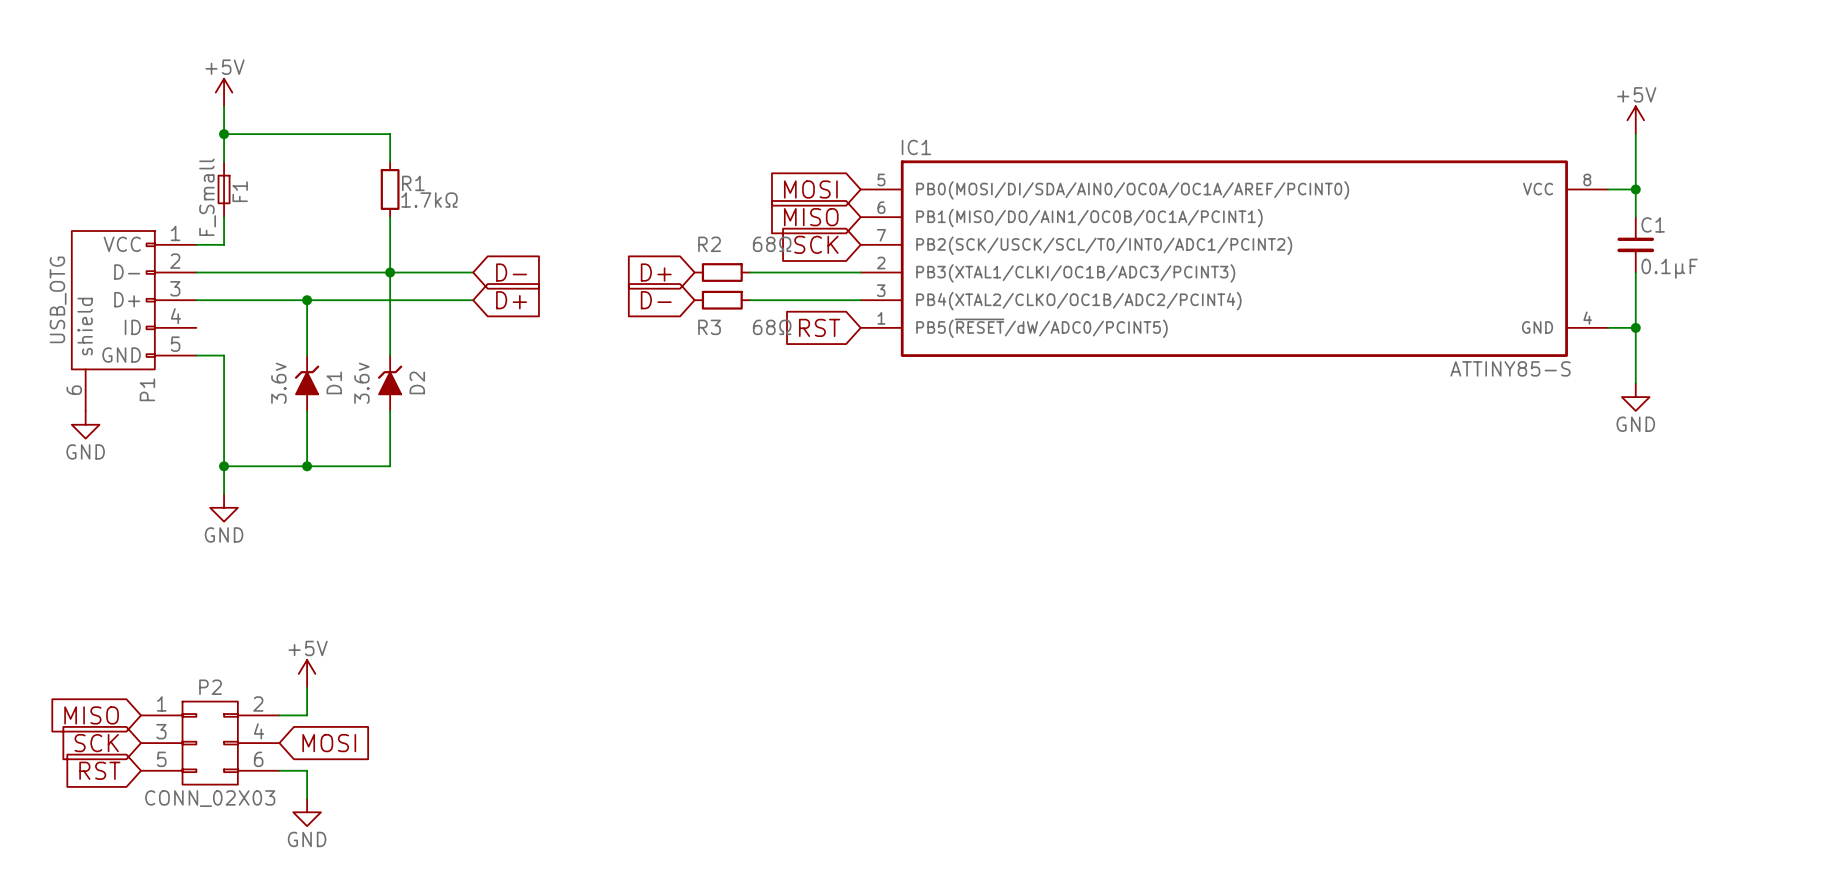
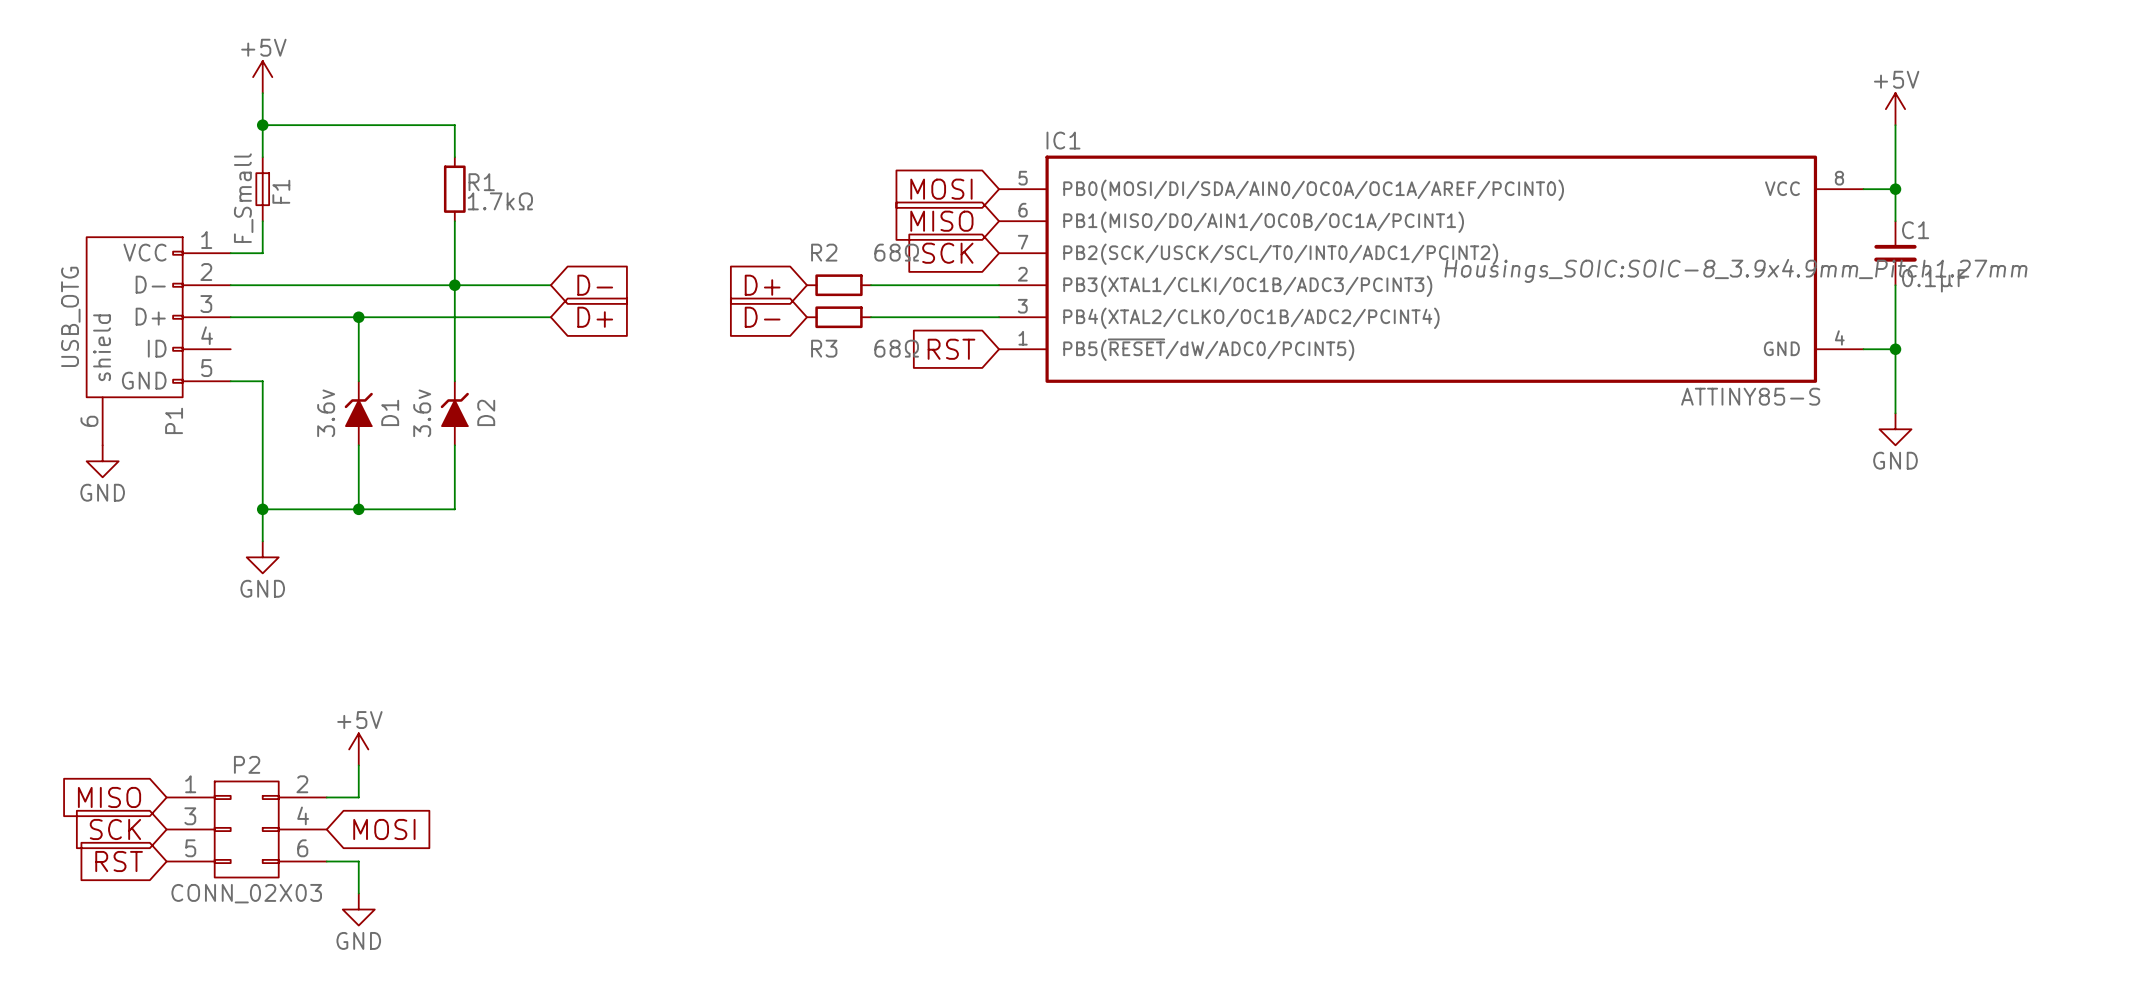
IC1 text: none -> Housings_SOIC:SOIC-8_3.9x4.9mm_Pitch1.27mm (1735, 270)

